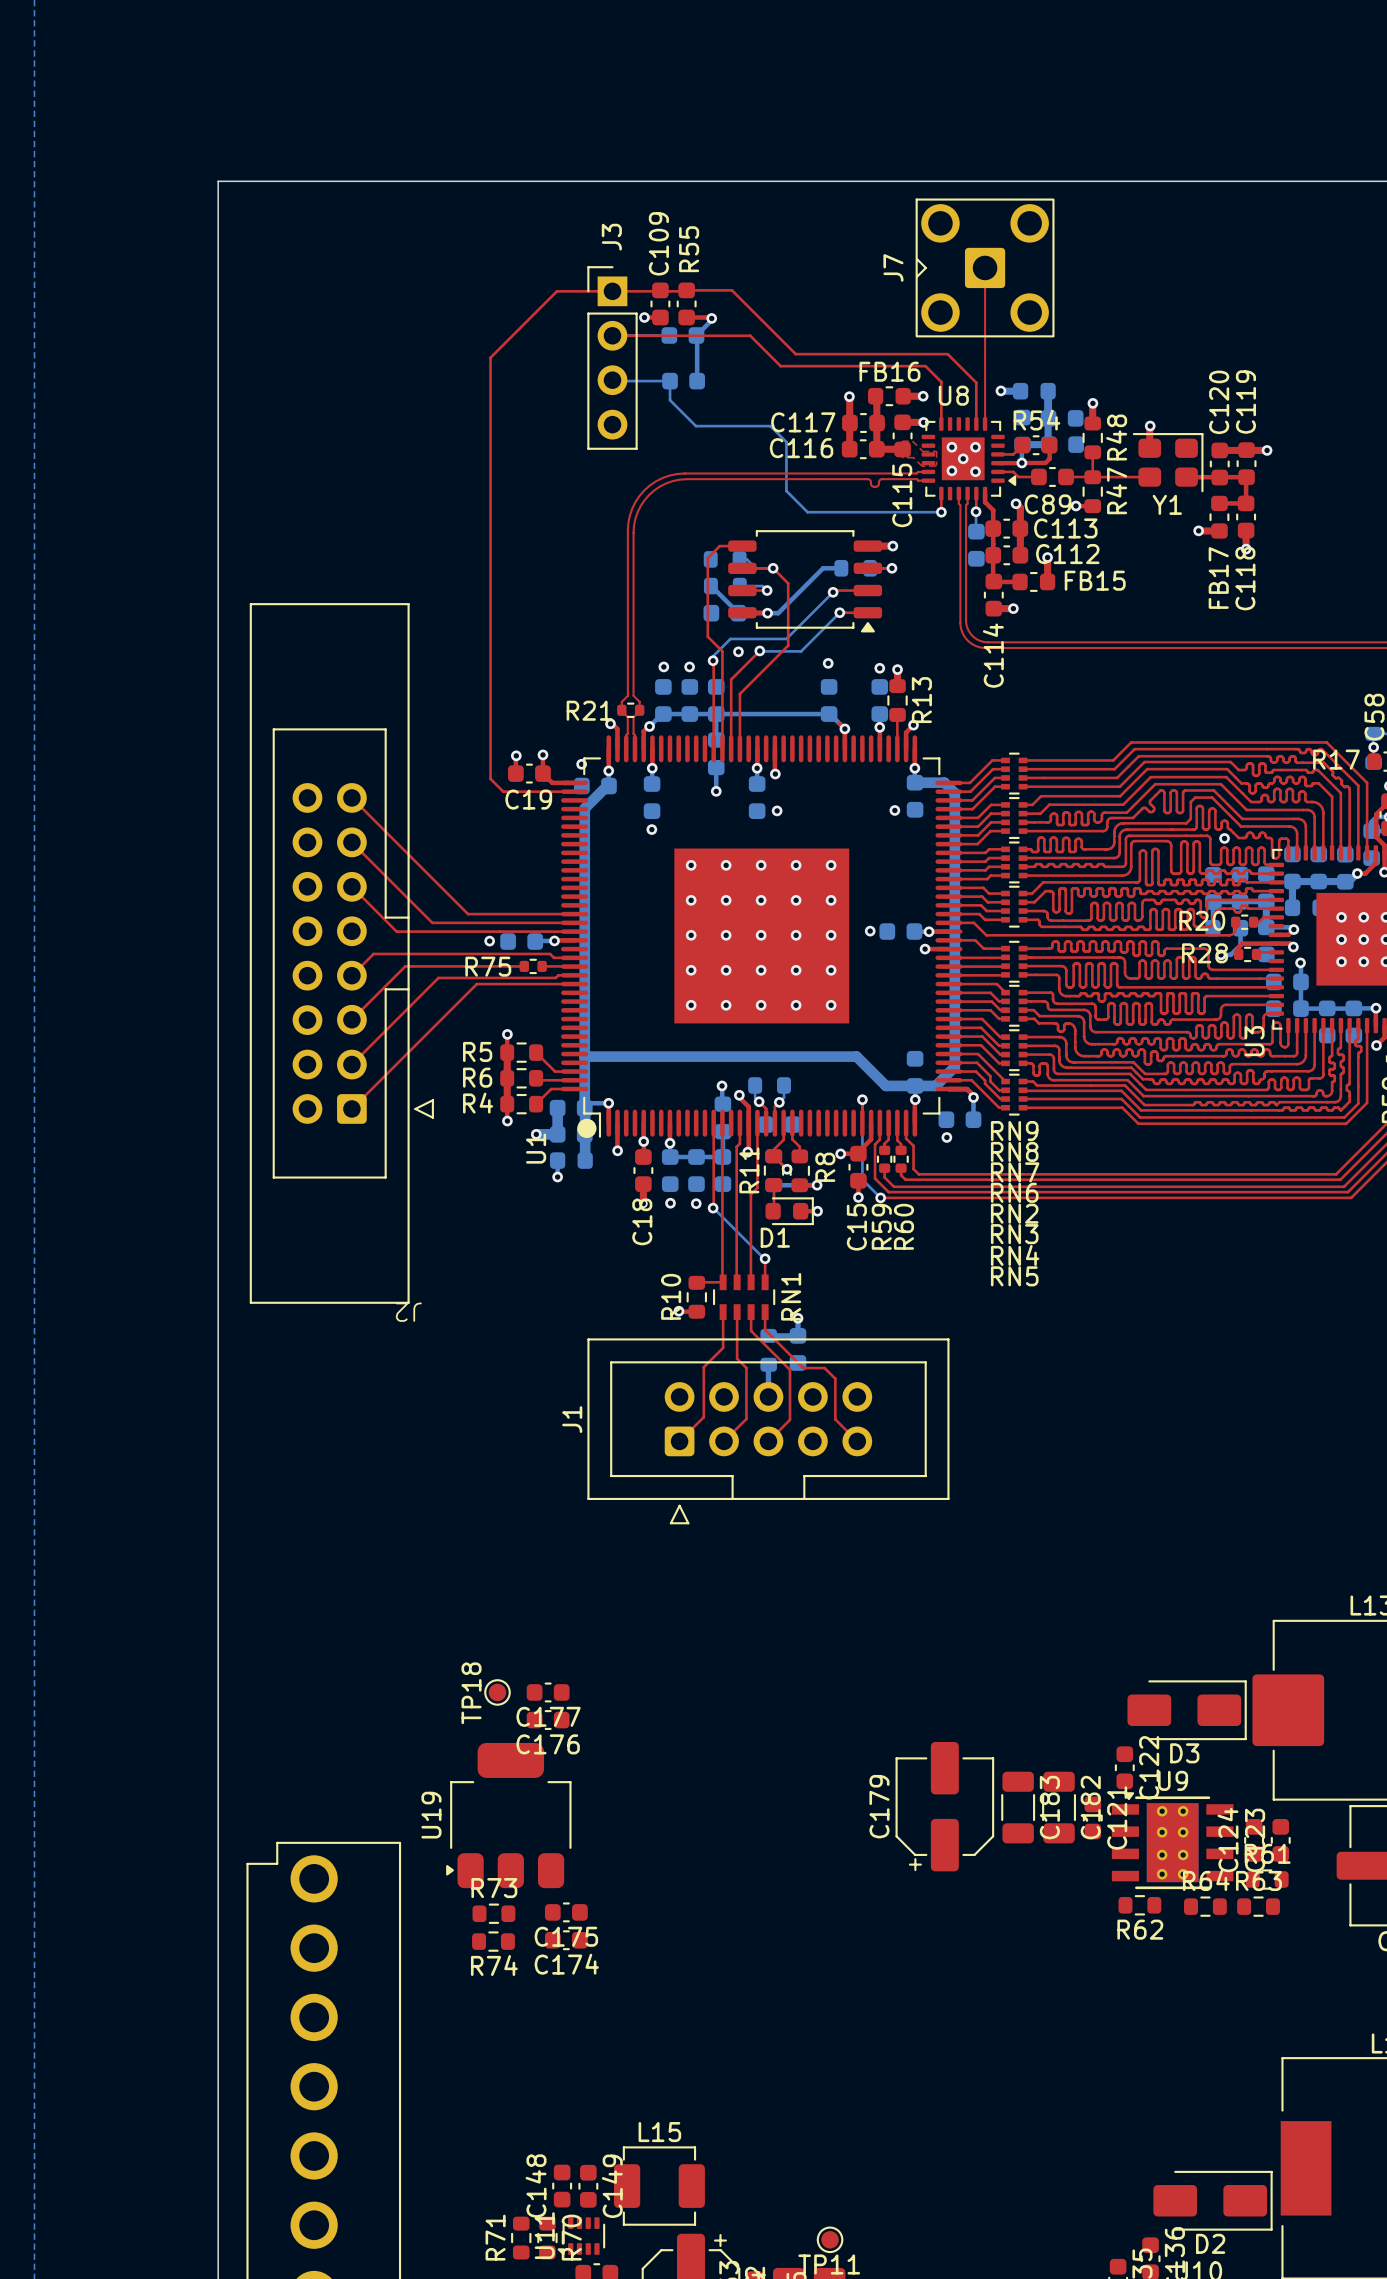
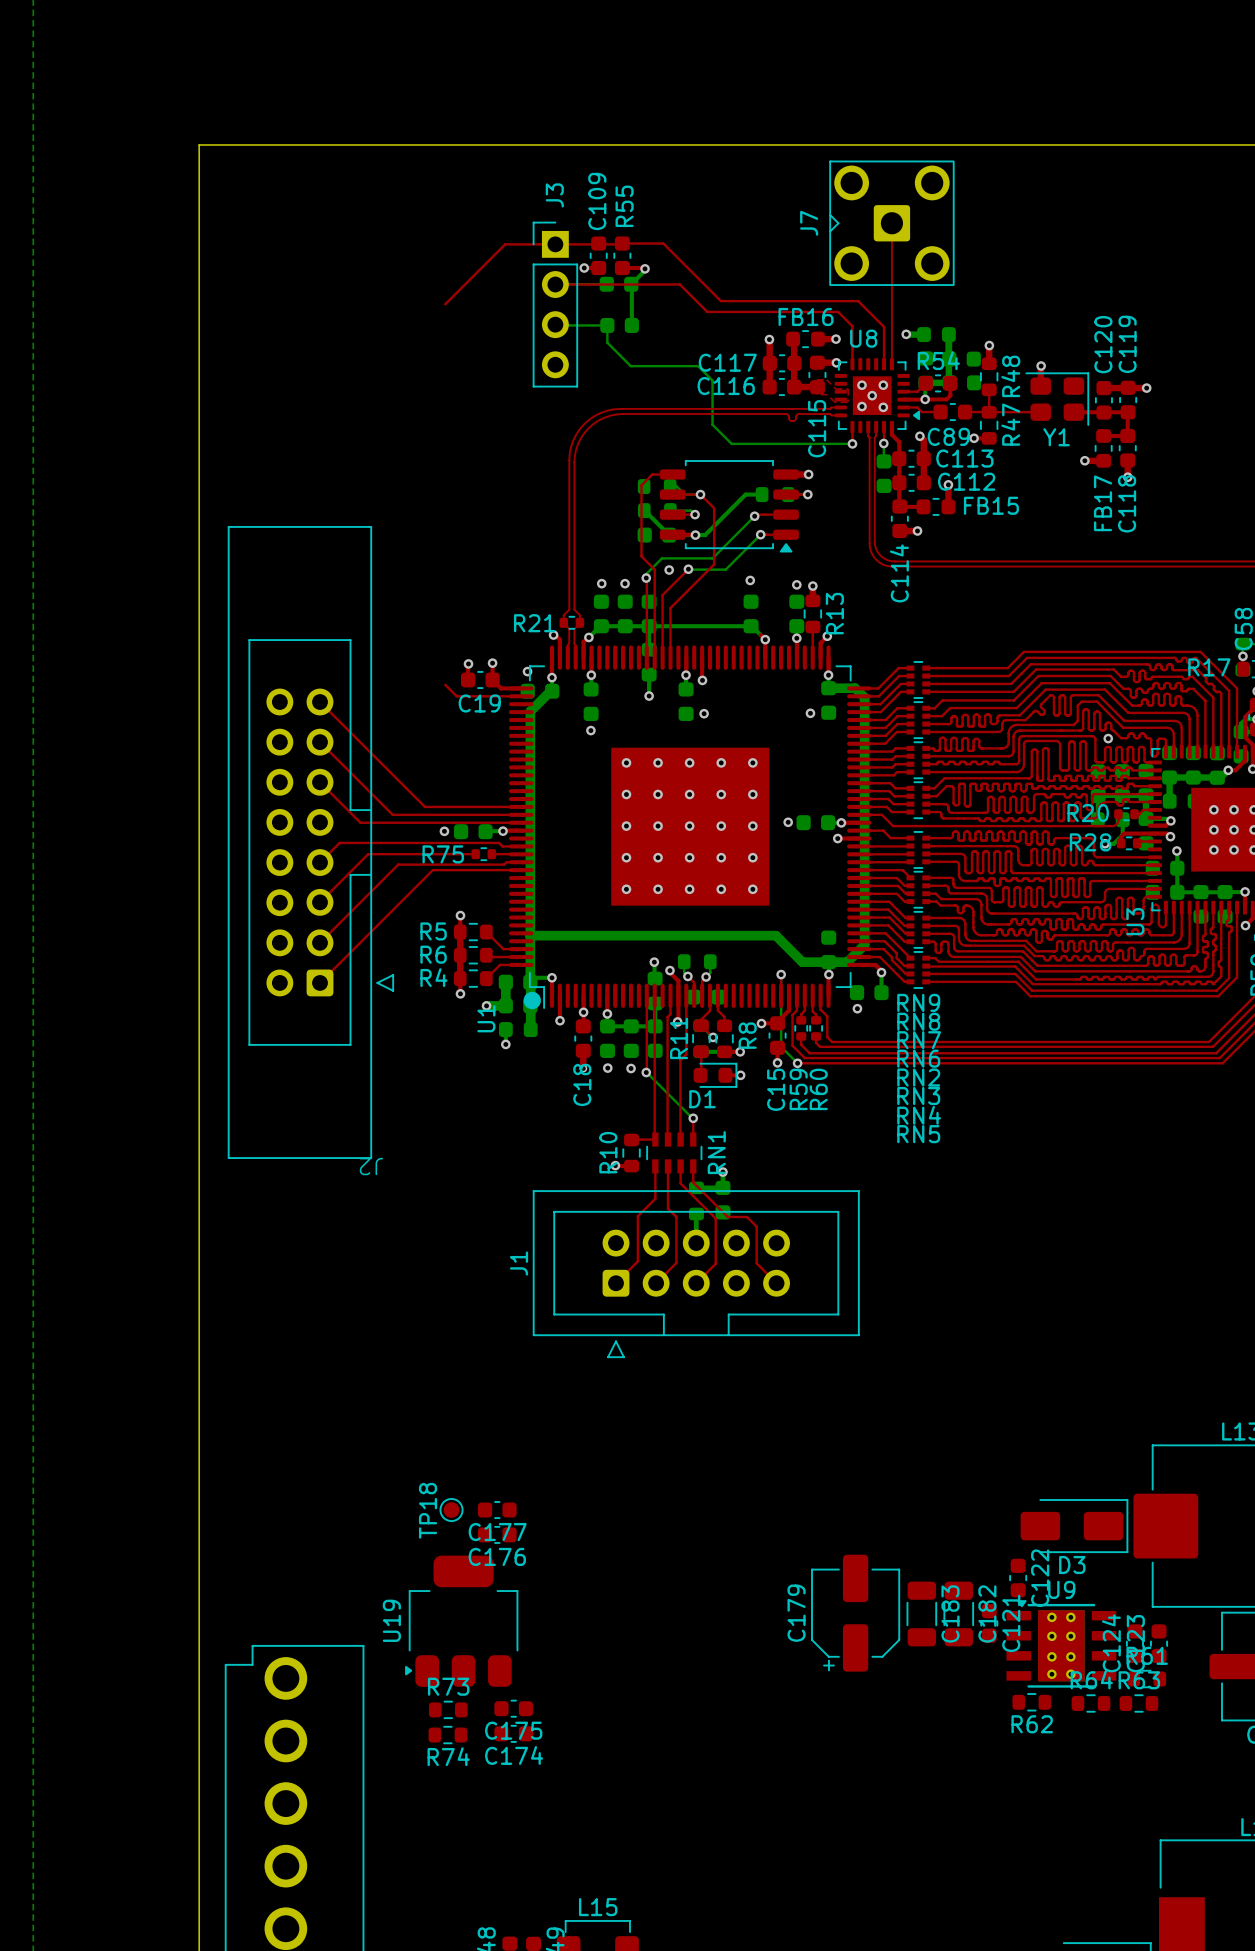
top track: (490, 357) (490, 778) -> none

